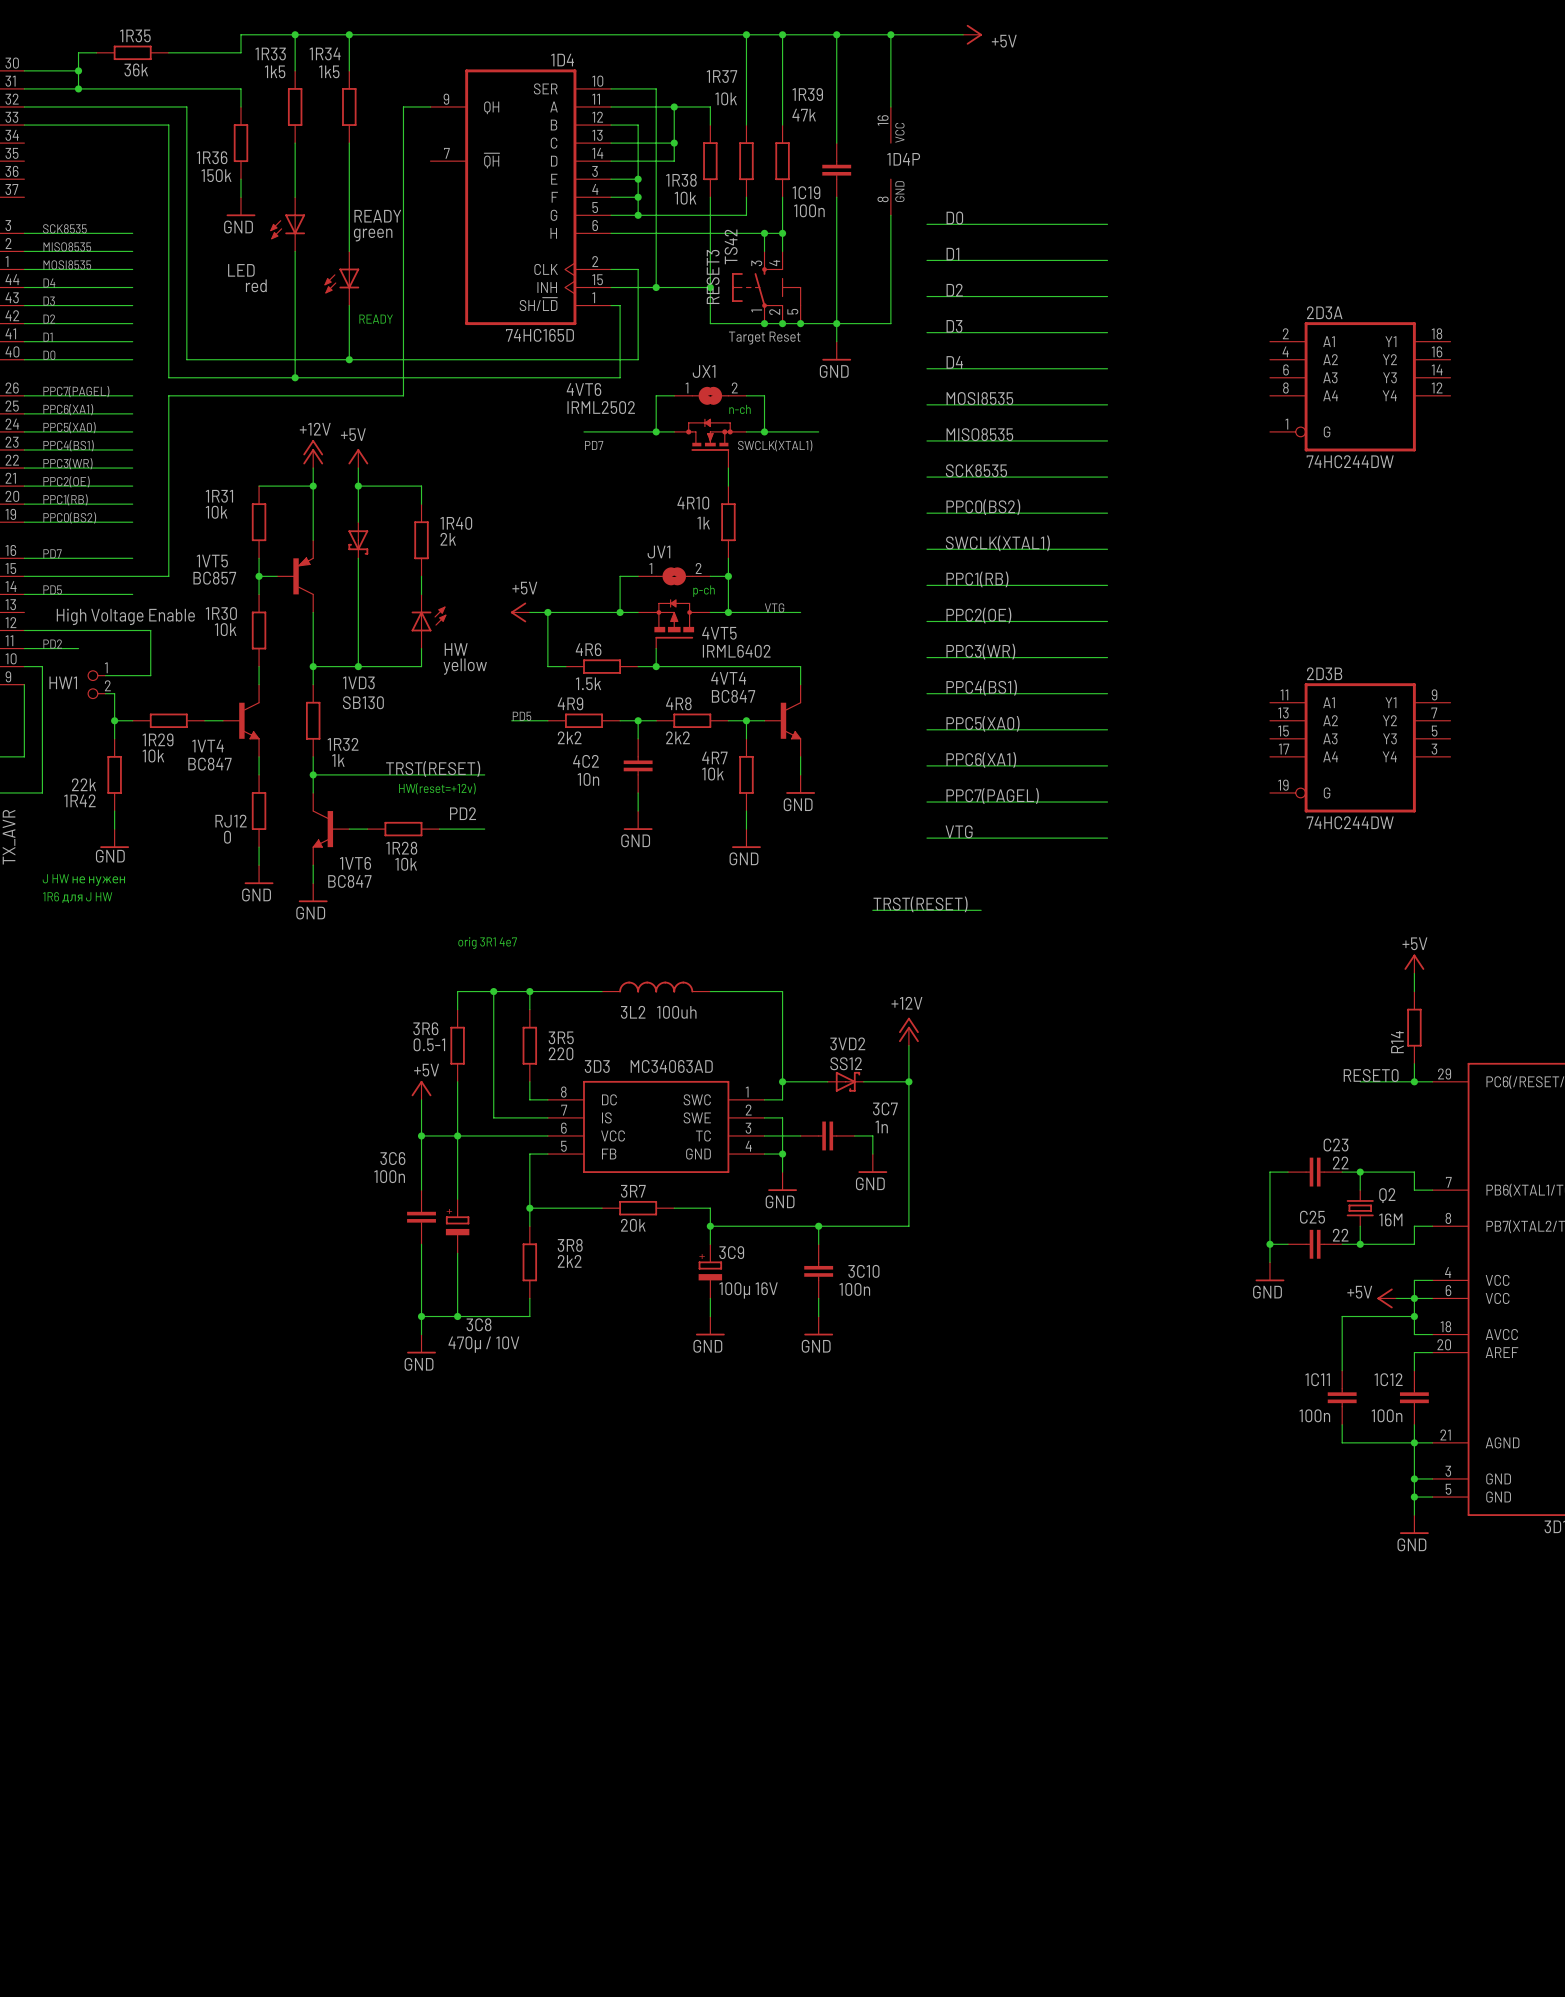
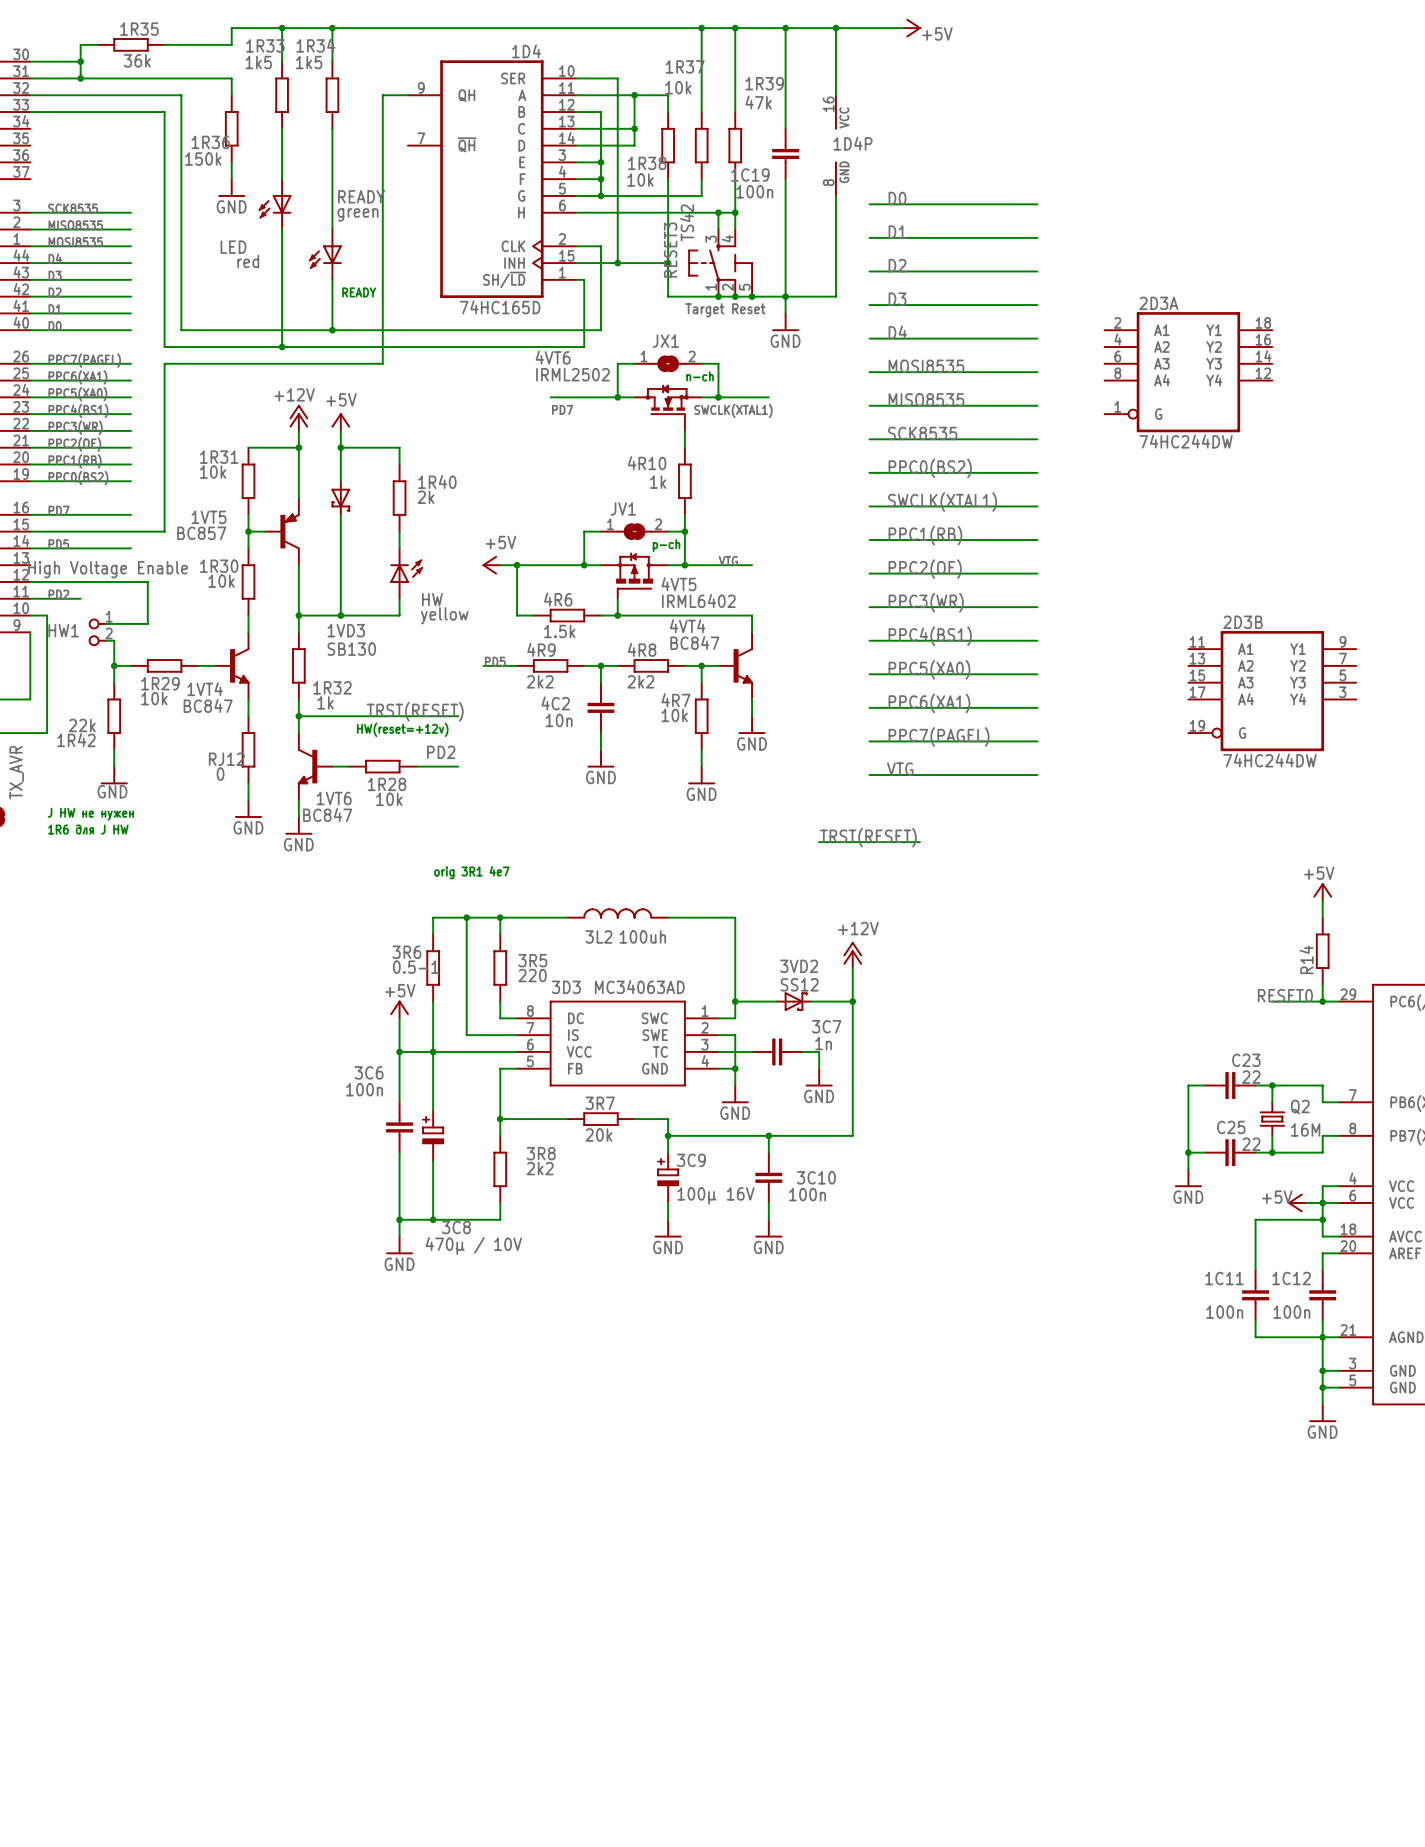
2D3A position: (1360, 386) -> (1188, 372)

